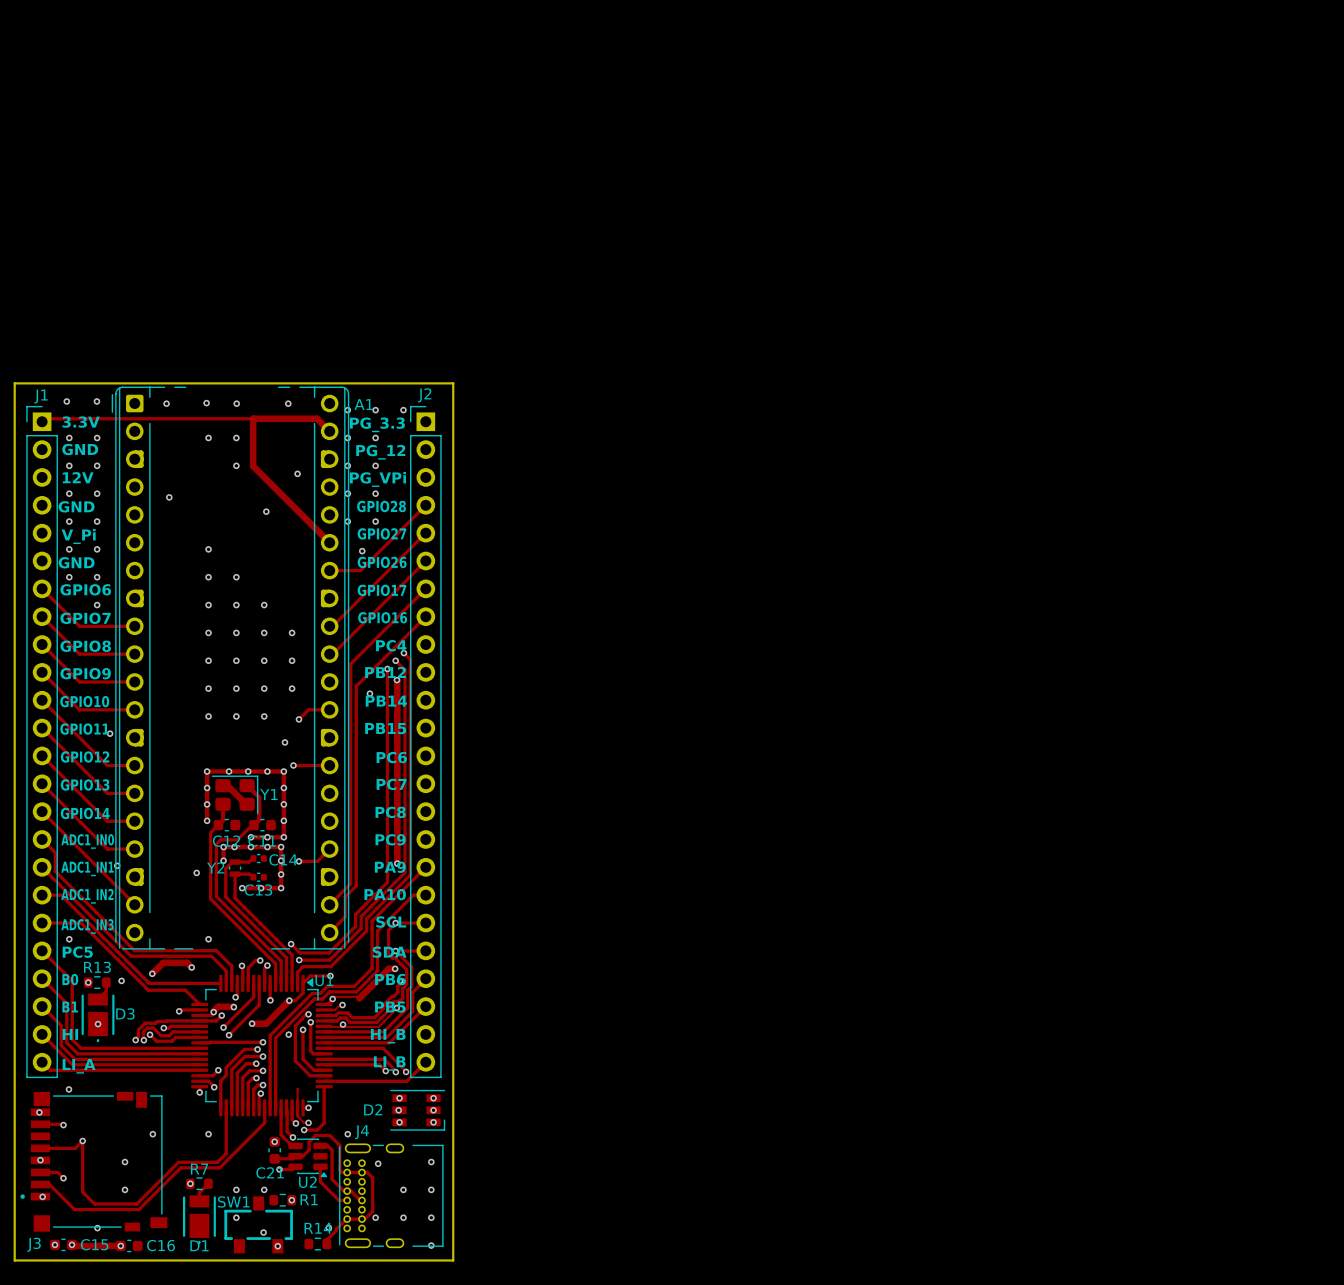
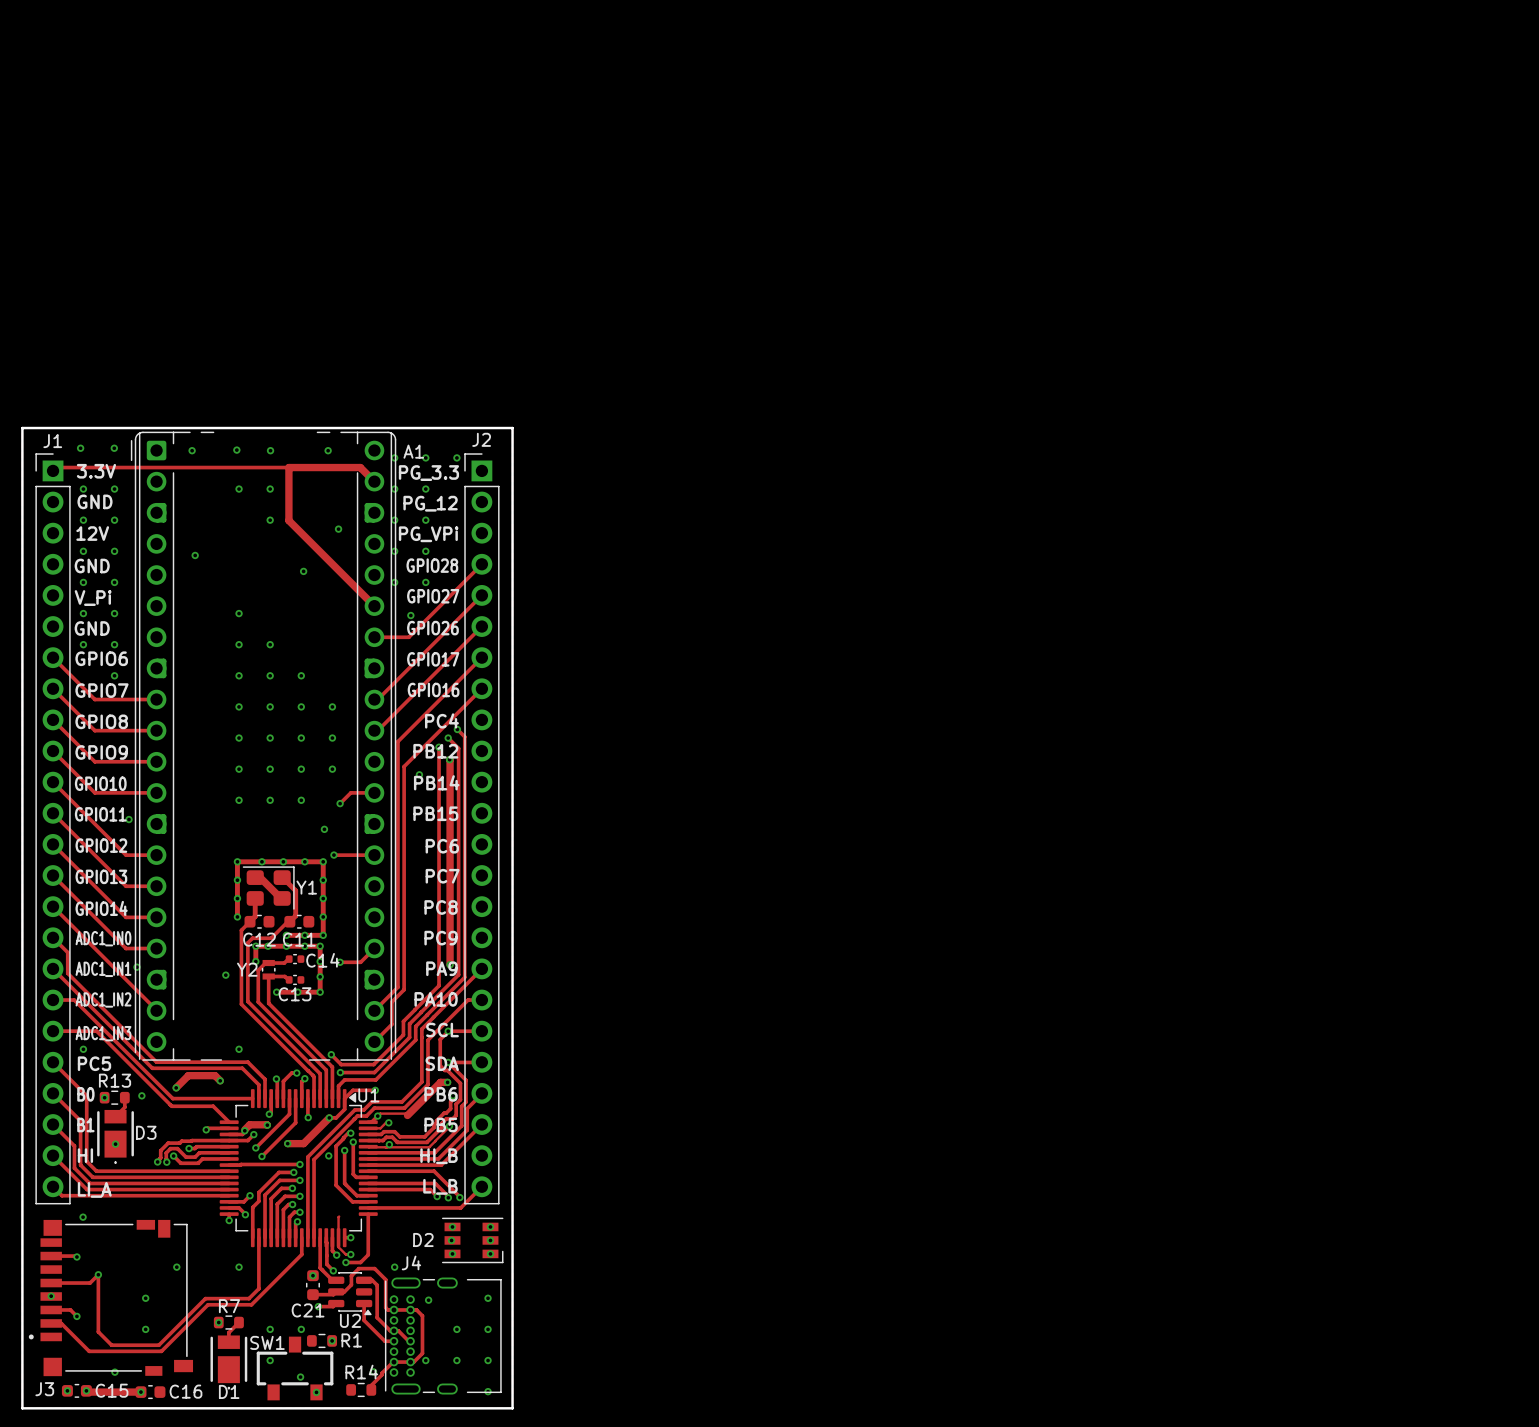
via: (39, 1112) -> none
via: (42, 1196) -> none

